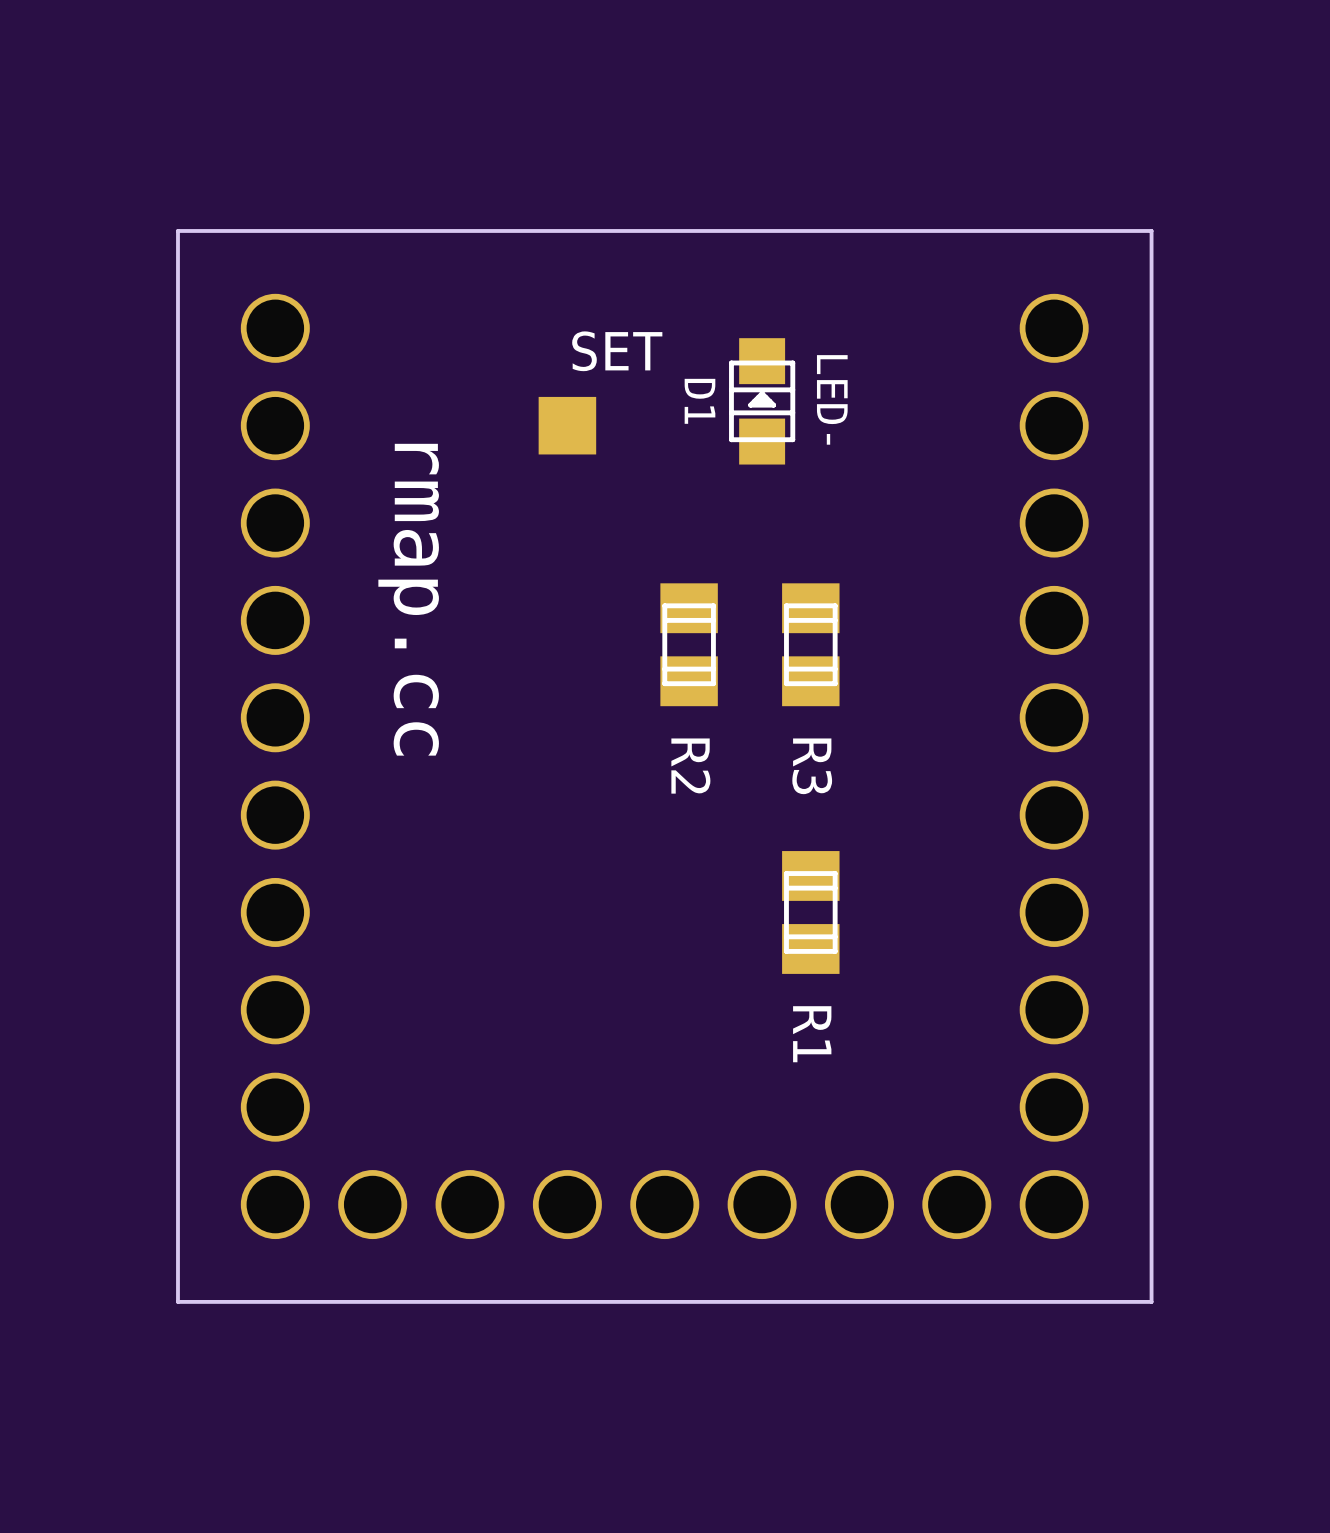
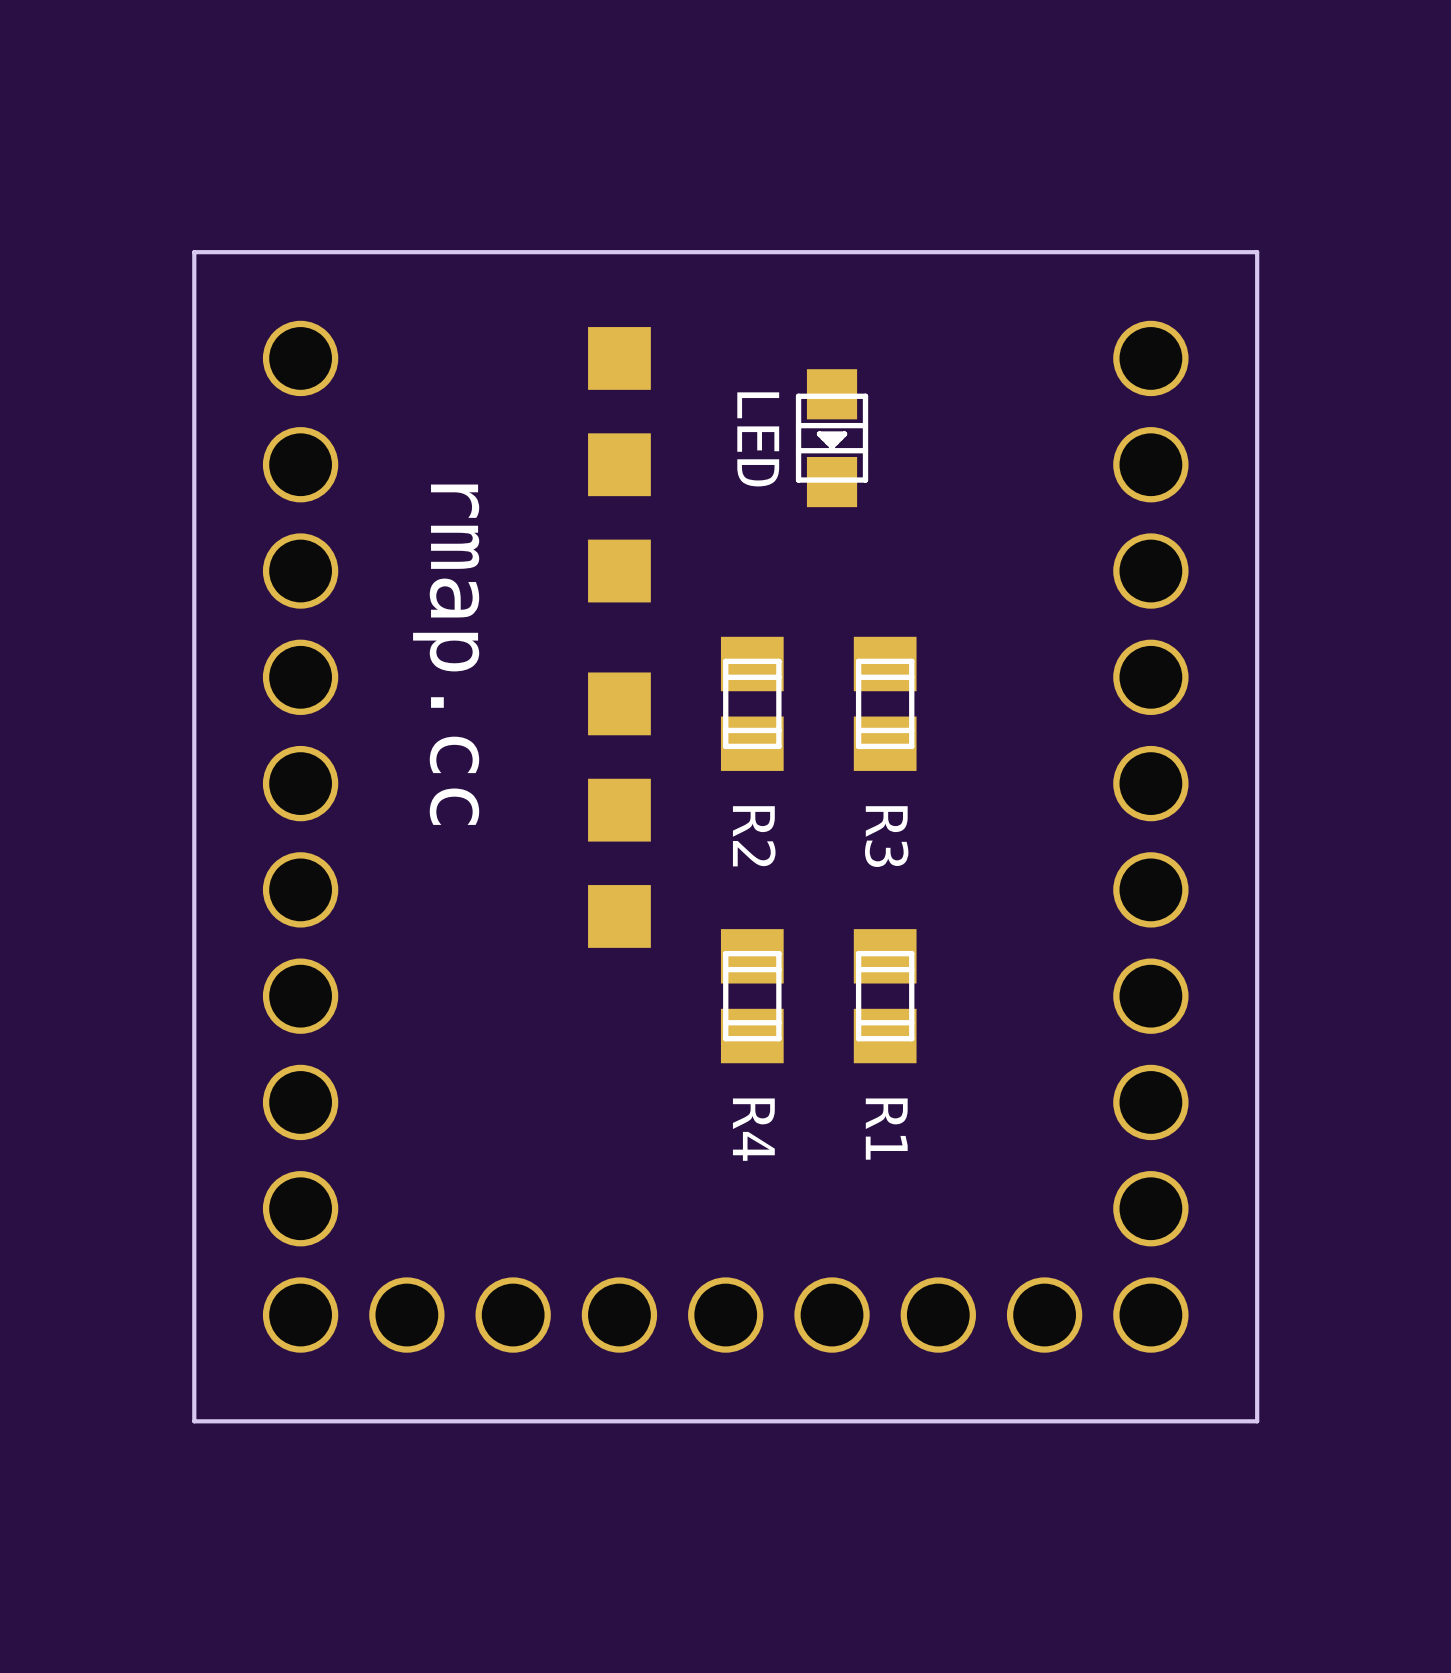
part: none -> (619, 358)
text: SET (617, 351) -> none
D1: LED- (762, 401) -> none
part: none -> LED (832, 438)
part: none -> (619, 571)
part: none -> (619, 703)
part: none -> (619, 810)
part: none -> (619, 916)
R4: none -> (752, 996)

